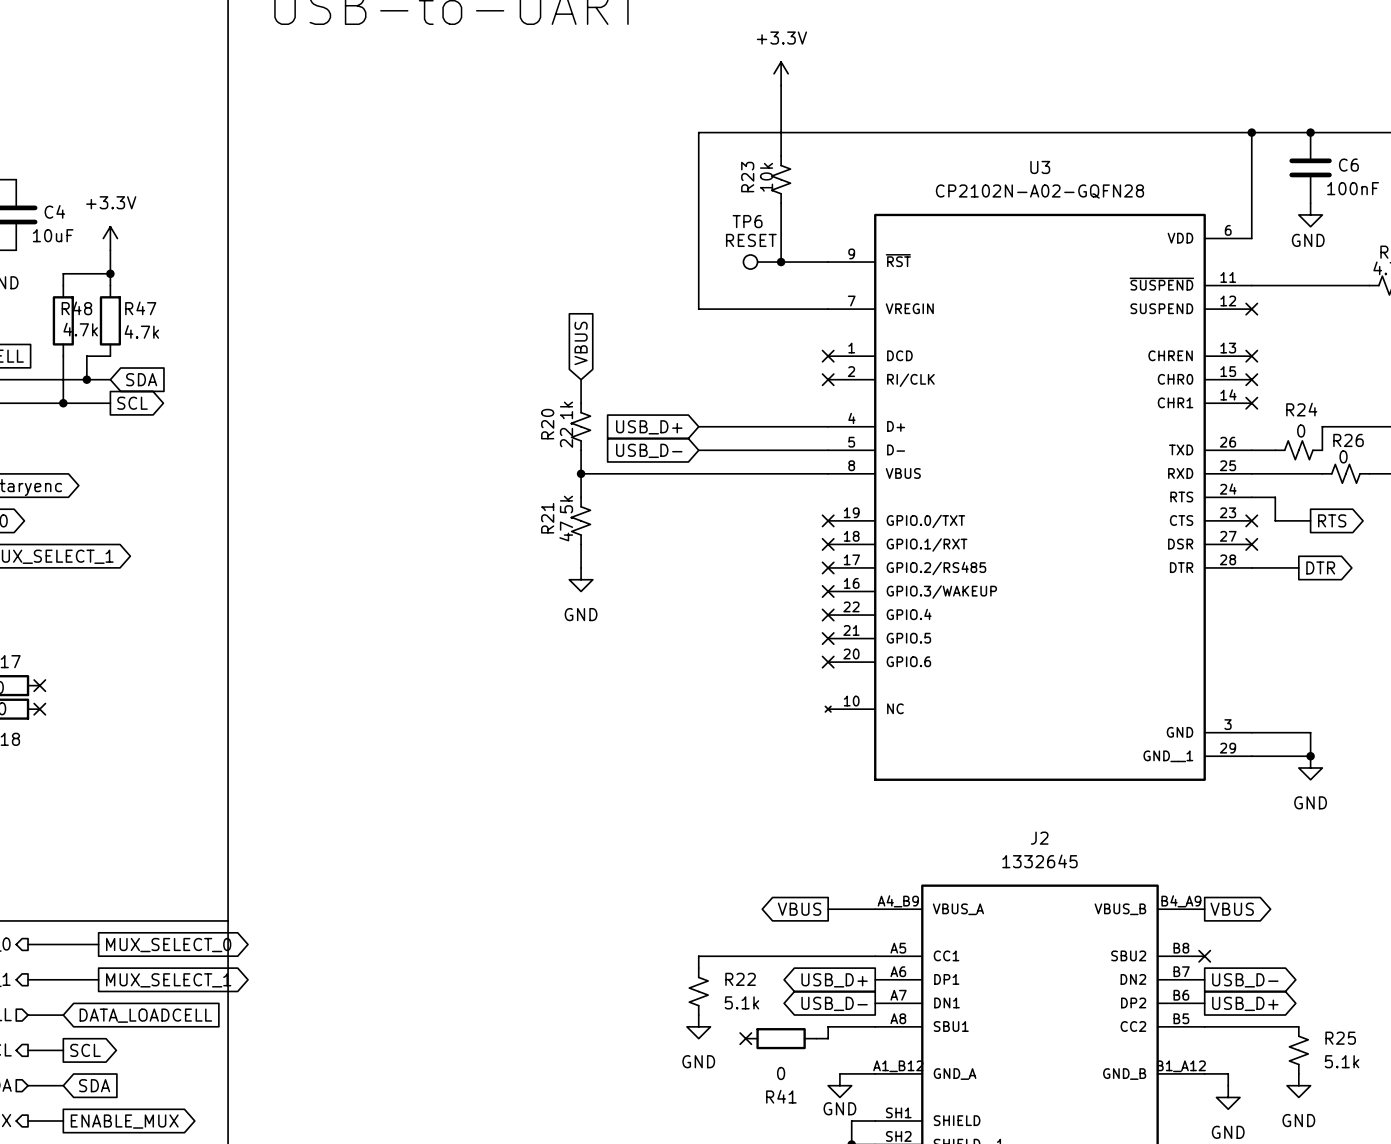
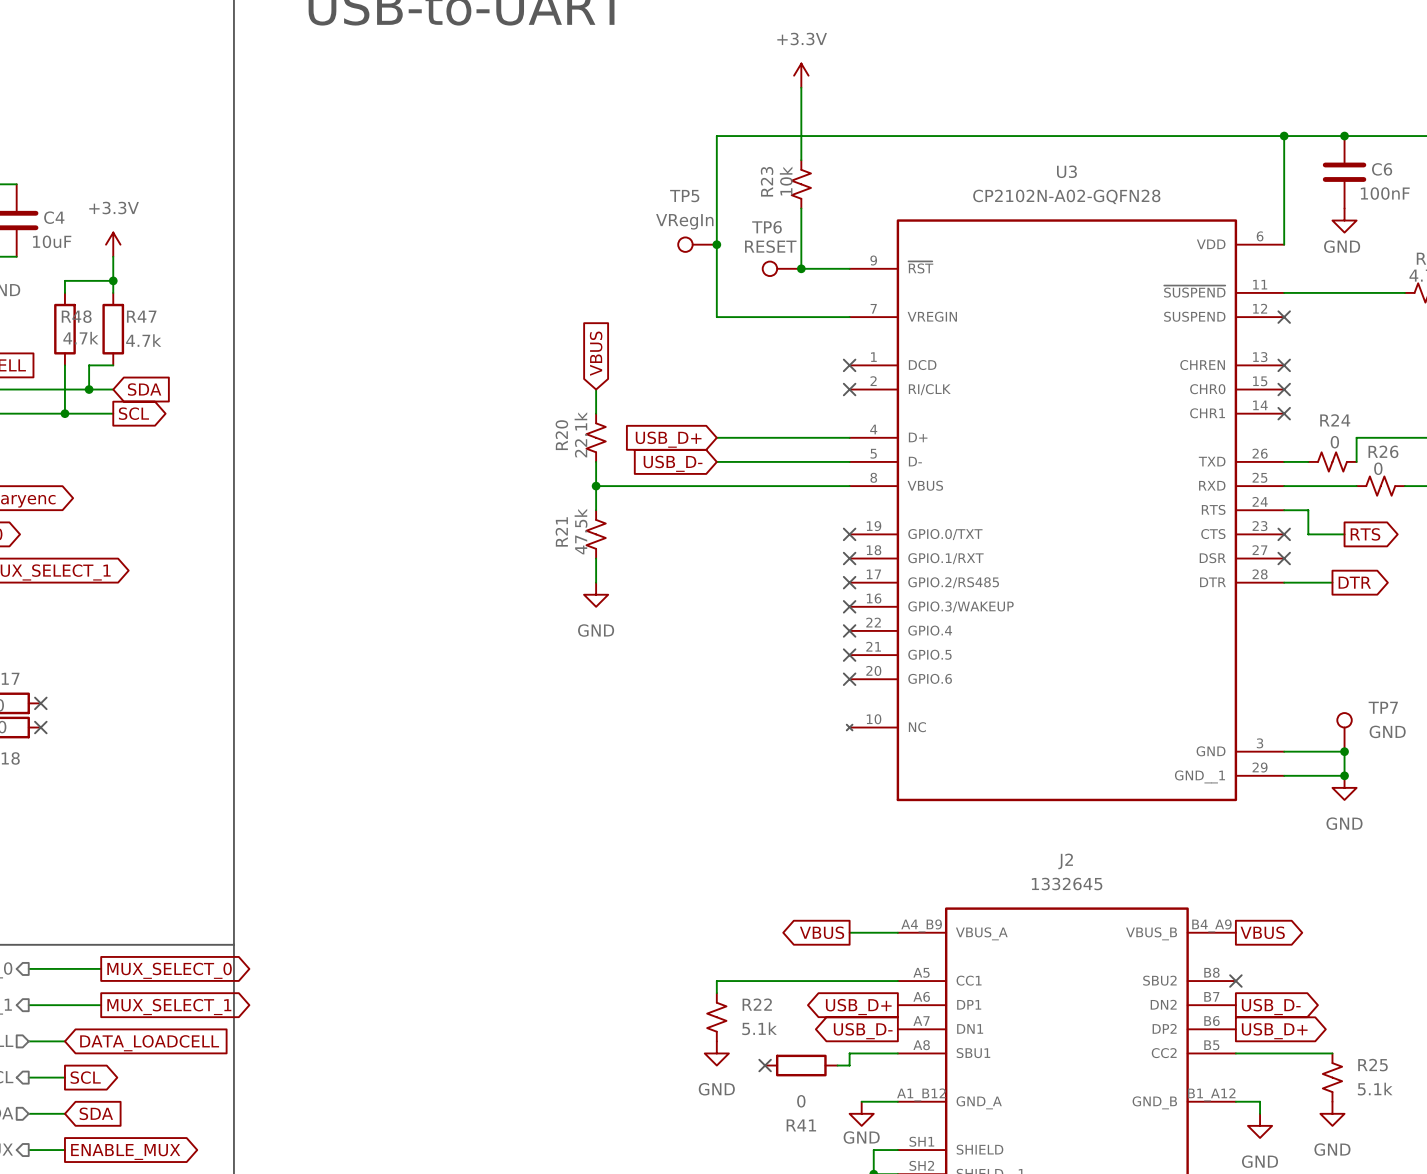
TP5: none -> VRegIn (697, 244)
junction: none -> (716, 244)
TP7: none -> GND (1344, 732)
junction: none -> (1344, 751)

